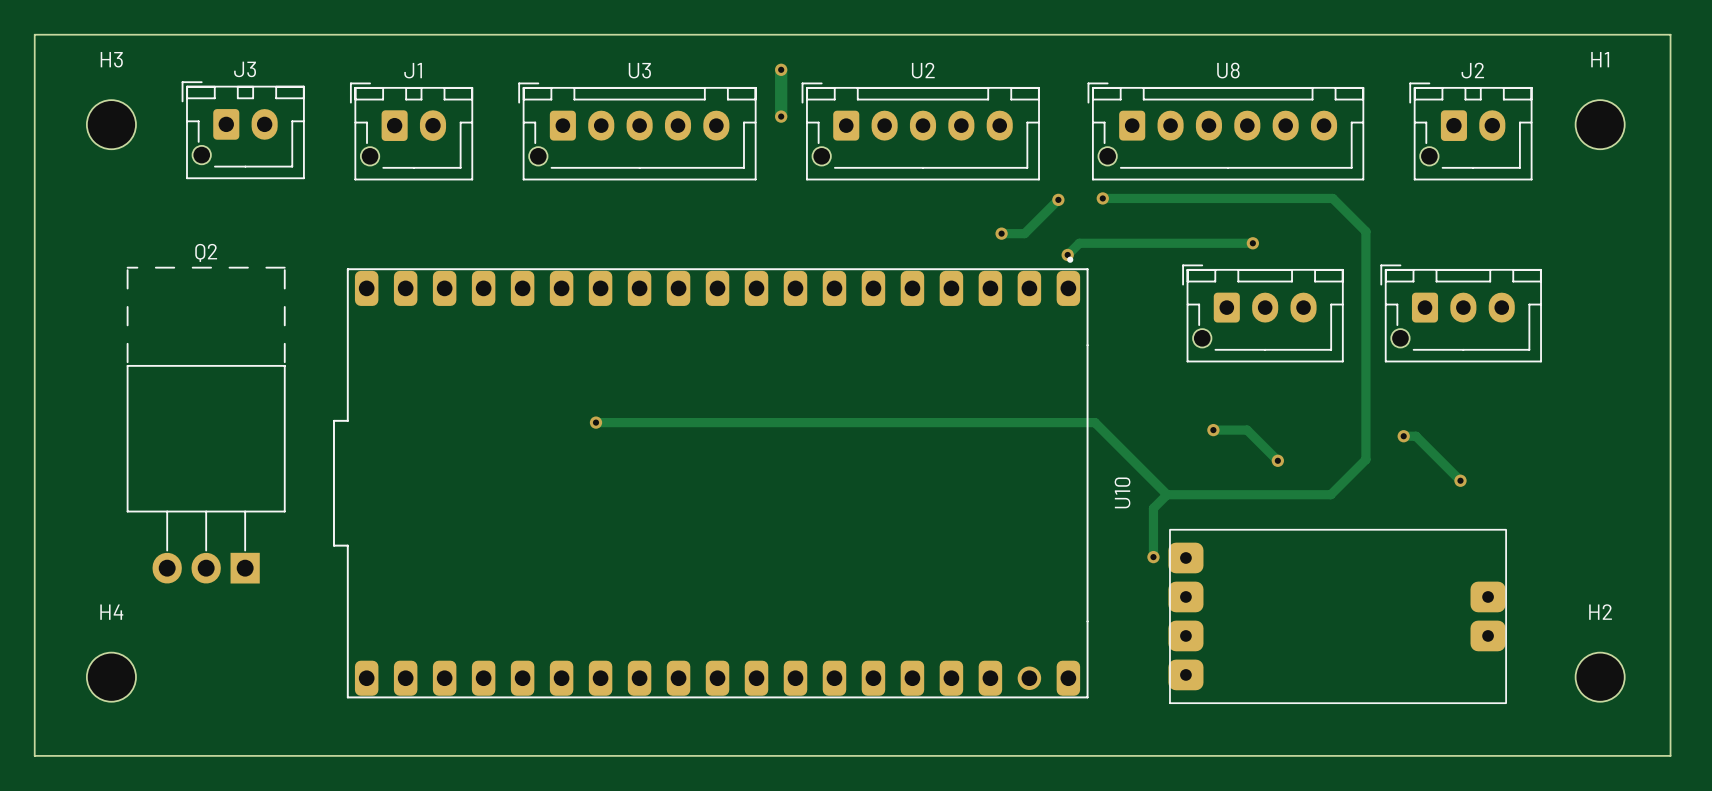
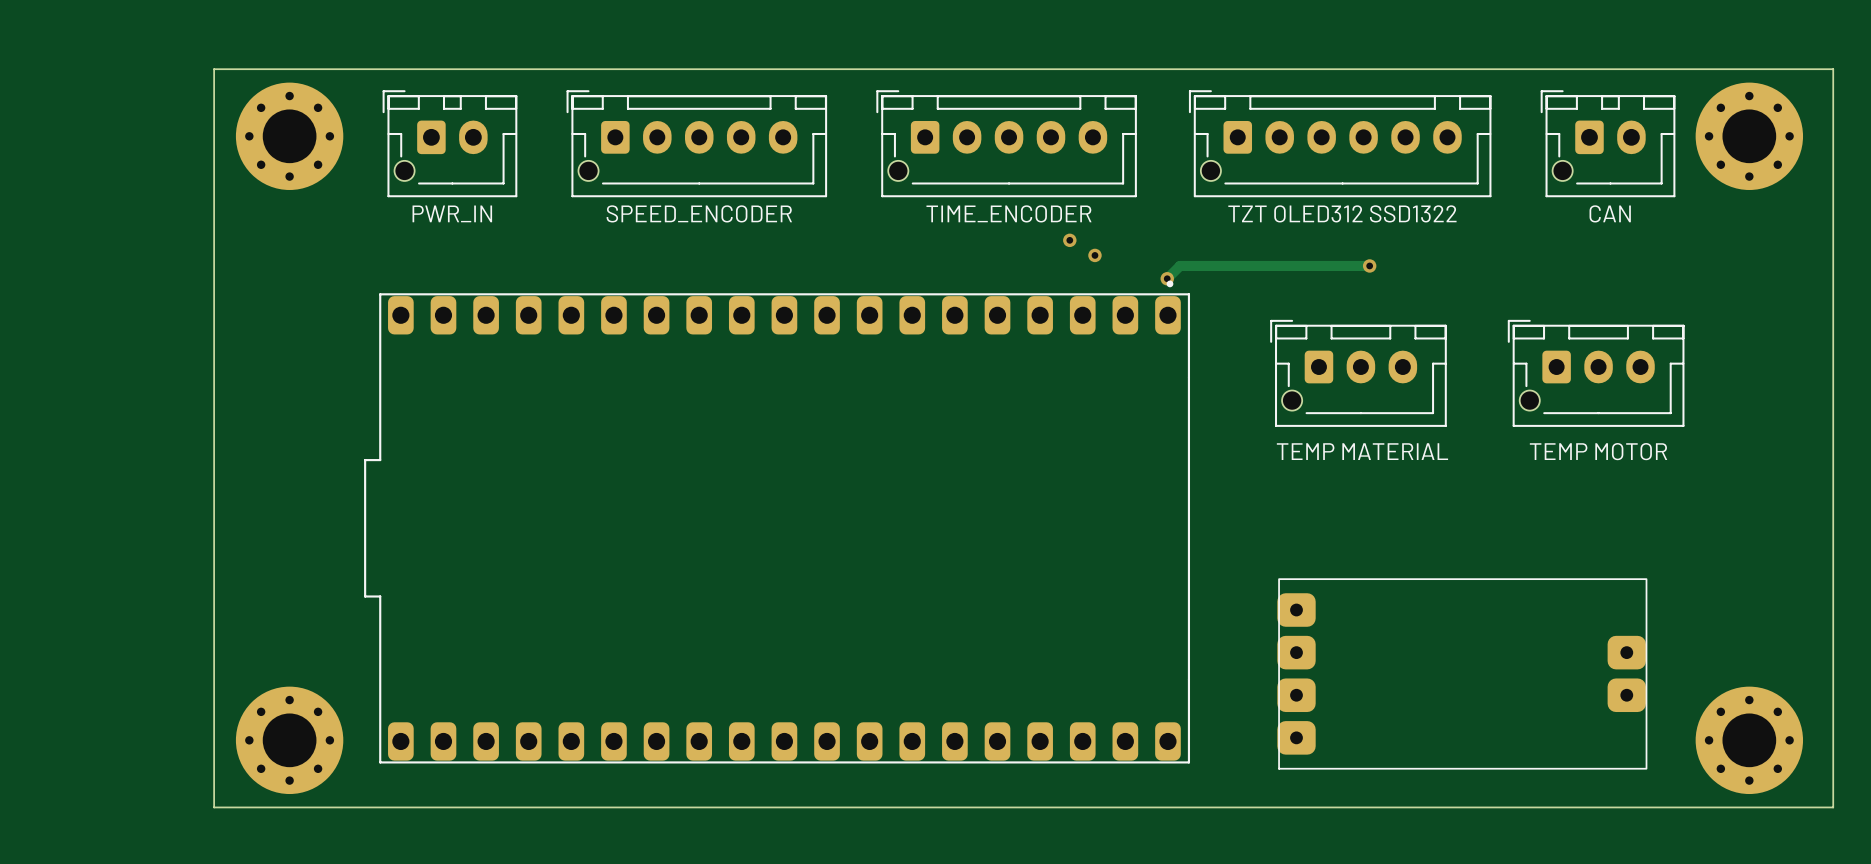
board edge: (34, 34) (1670, 34) (1670, 755) (34, 755) (34, 34) -> (214, 69) (214, 807) (1833, 807) (1833, 69) (214, 69)
track: (781, 69) (781, 116) -> none
via: (781, 69) -> none
J1 name: J1 (413, 70) -> none
U3 name: U3 (639, 70) -> none
U2 name: U2 (923, 70) -> none
U8 name: U8 (1228, 70) -> none
J2 name: J2 (1472, 70) -> none
via: (781, 116) -> none
H3: (111, 124) -> none
part: none -> (289, 136)
H1: (1600, 124) -> none
part: none -> (1749, 136)
J3: (243, 130) -> none
J1 value: none -> PWR_IN (452, 213)
U3 value: none -> SPEED_ENCODER (699, 213)
U2 value: none -> TIME_ENCODER (1008, 213)
U8 value: none -> TZT OLED312 SSD1322 (1342, 213)
J2 value: none -> CAN (1610, 213)
track: (1102, 198) (1332, 198) (1365, 231) (1365, 459) (1330, 494) (1167, 494) -> none
via: (1102, 198) -> none
track: (1058, 199) (1024, 233) (1001, 233) -> none
via: (1058, 199) -> none
via: none -> (1069, 240)
part: (1262, 313) -> none
part: (1461, 313) -> none
part: none -> TEMP MATERIAL (1358, 373)
part: none -> TEMP MOTOR (1596, 373)
track: (596, 422) (1094, 422) (1167, 494) -> none
via: (596, 422) -> none
Q2: (206, 425) -> none
track: (1213, 430) (1247, 430) (1277, 460) -> none
via: (1213, 430) -> none
track: (1403, 436) (1415, 436) (1460, 480) -> none
via: (1403, 436) -> none
via: (1277, 460) -> none
U10: (710, 477) -> none
part: none -> (777, 522)
via: (1460, 480) -> none
track: (1167, 494) (1153, 508) (1153, 557) -> none
via: (1153, 557) -> none
H4: (111, 677) -> none
part: none -> (289, 740)
H2: (1600, 677) -> none
part: none -> (1749, 740)

